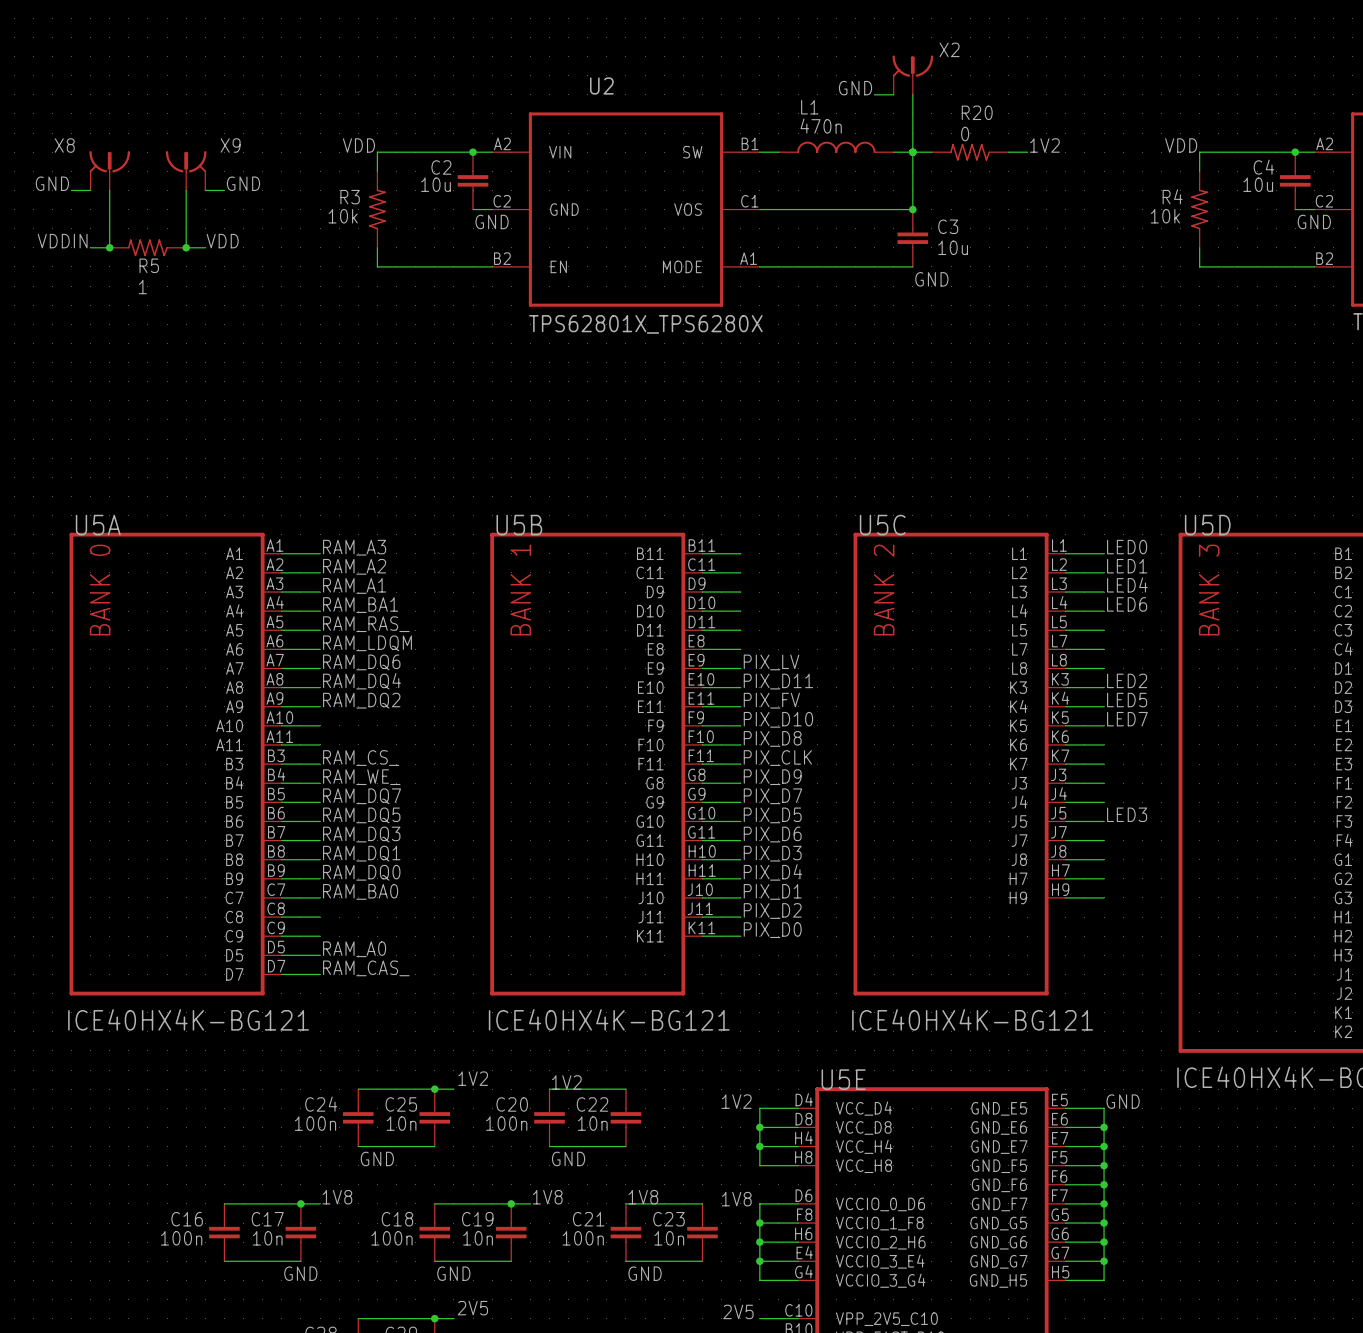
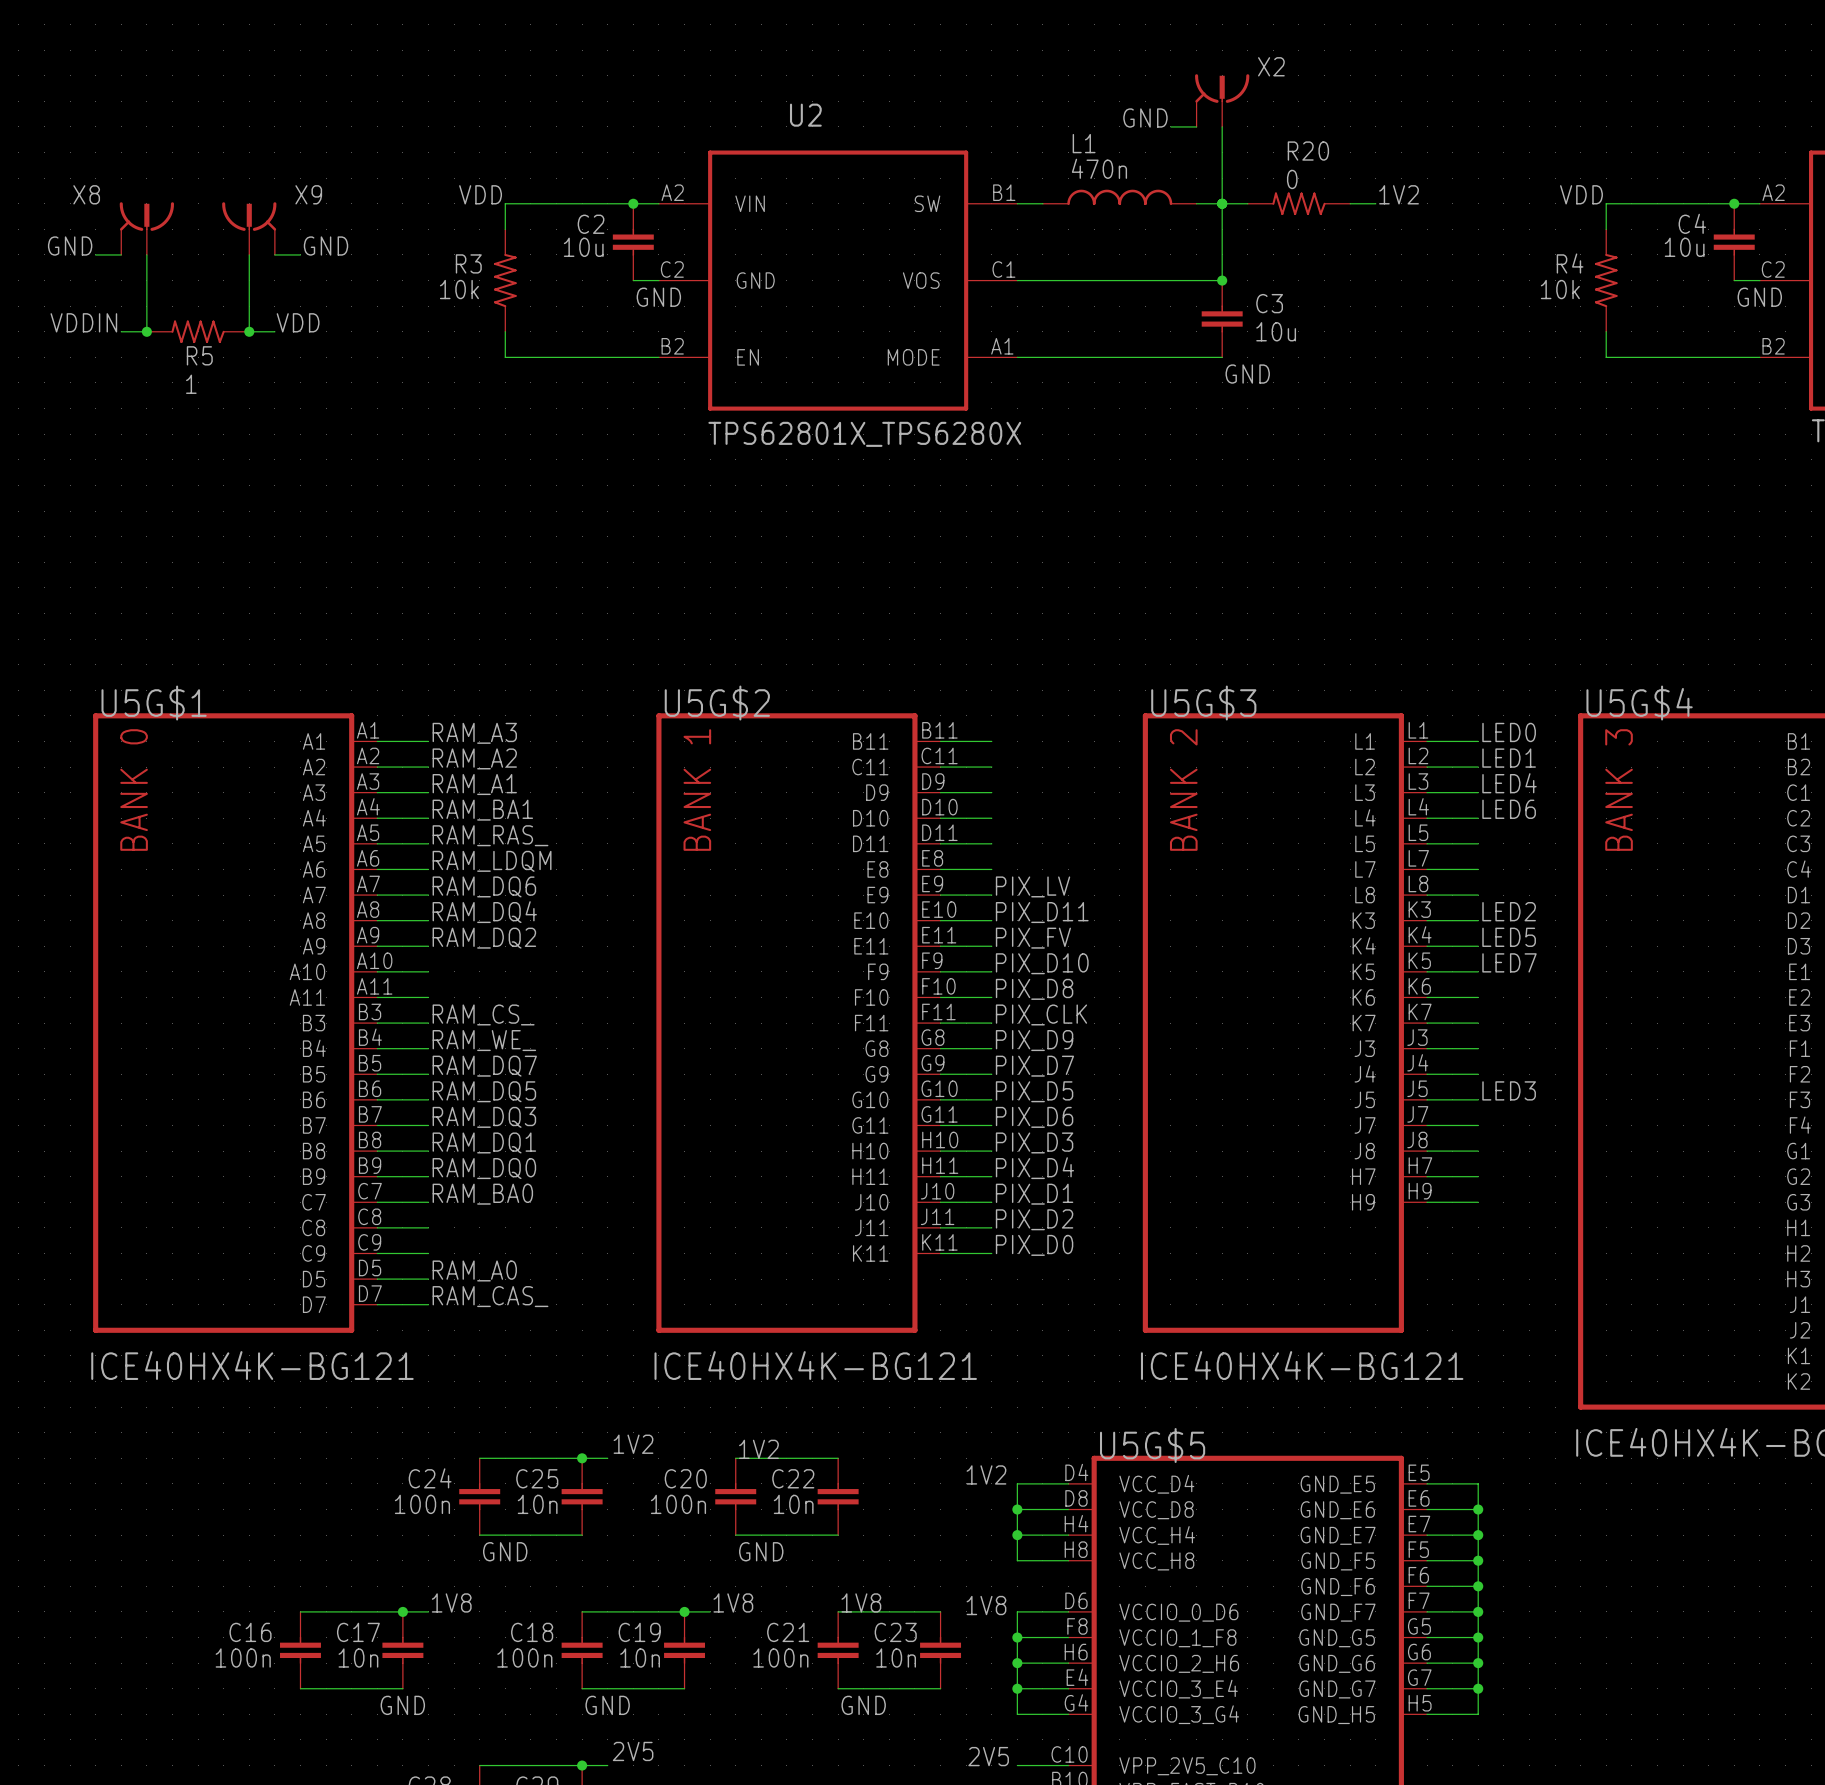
U5A name: U5A (98, 525) -> U5G$1 (154, 703)
U5B name: U5B (519, 525) -> U5G$2 (717, 703)
U5C name: U5C (882, 525) -> U5G$3 (1203, 703)
U5D name: U5D (1207, 525) -> U5G$4 (1639, 703)
U5E name: U5E (843, 1079) -> U5G$5 (1152, 1445)
label: GND (1123, 1101) -> none

